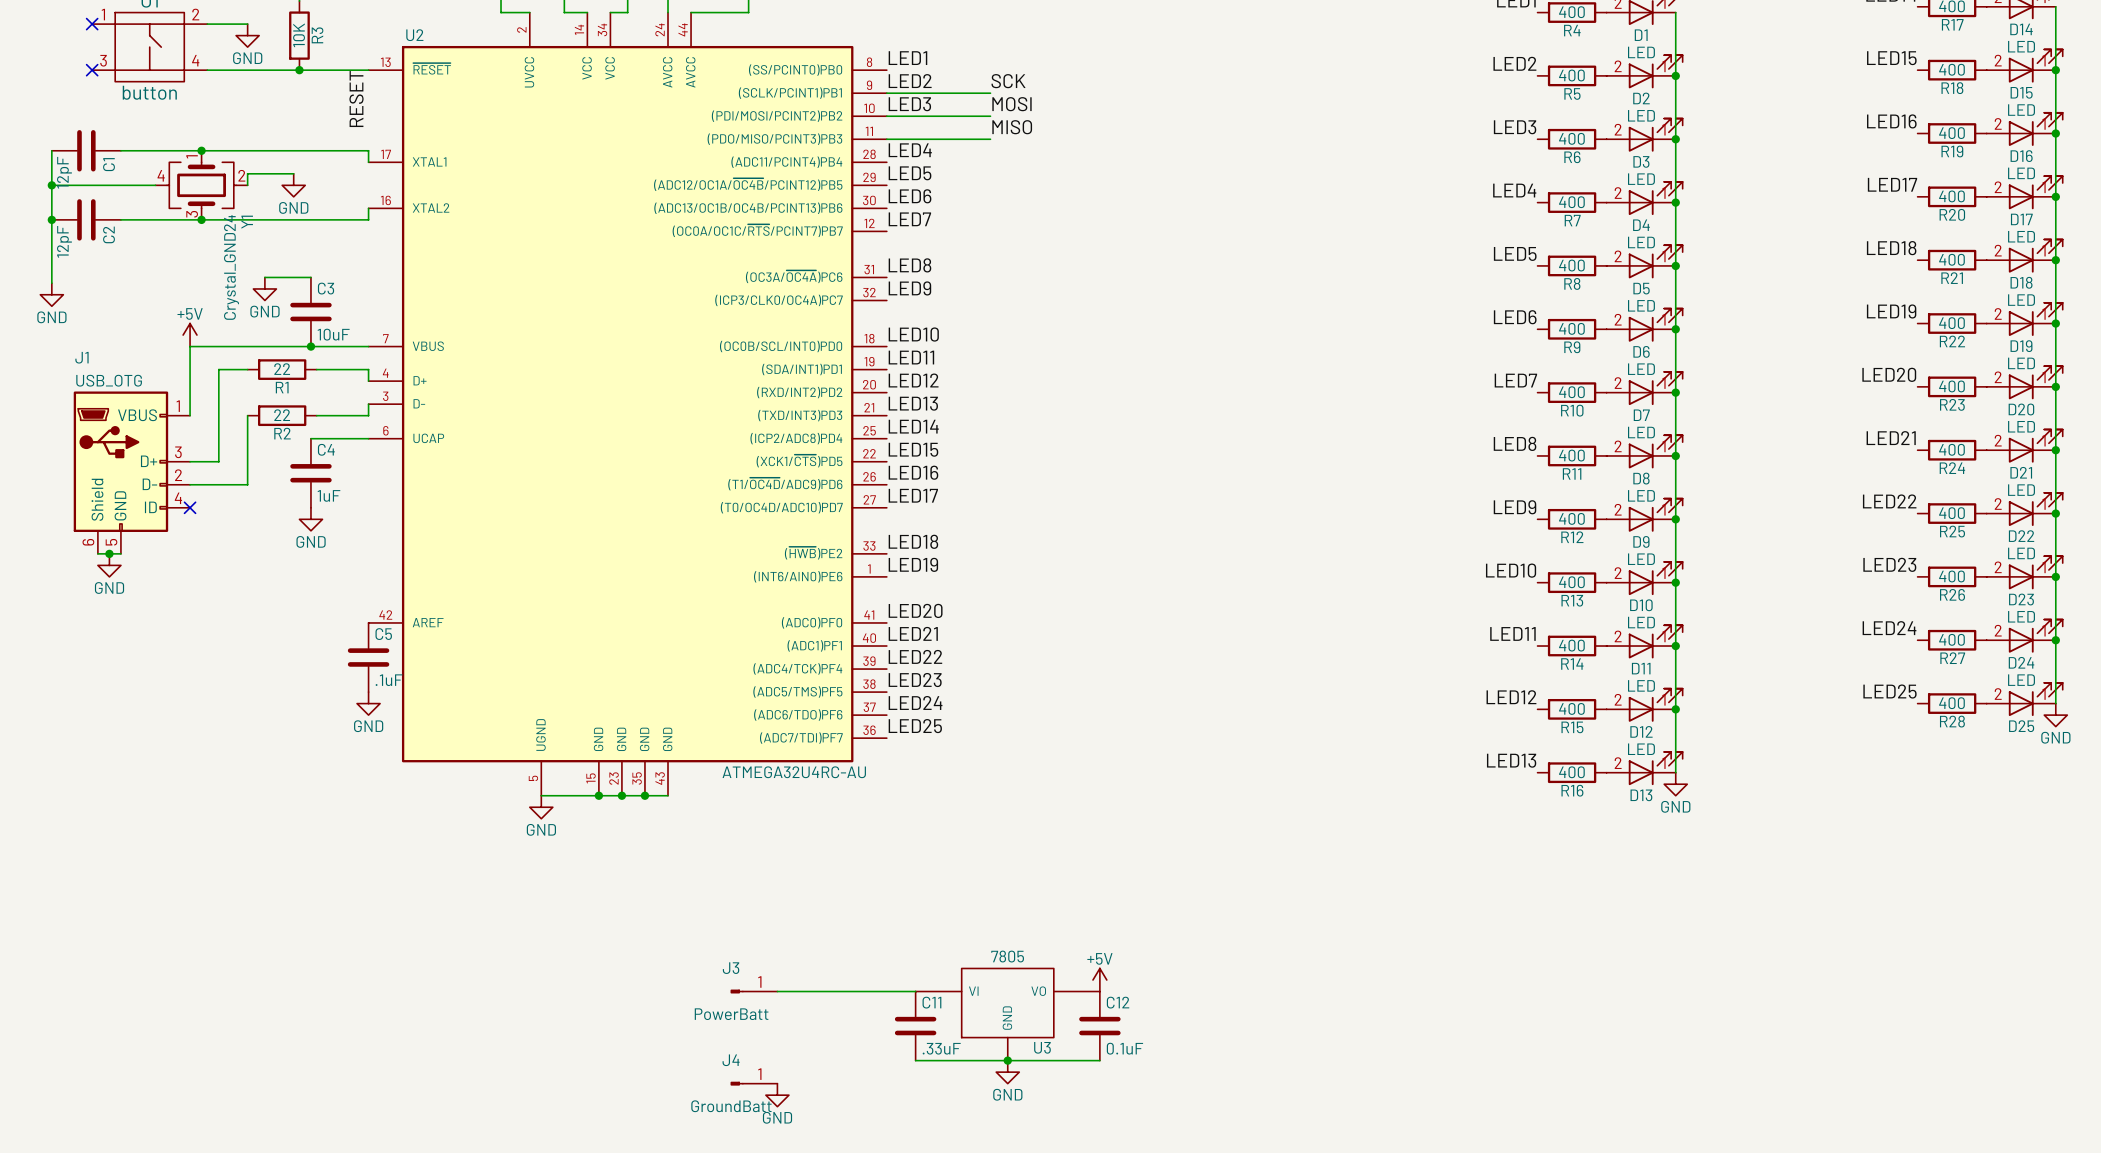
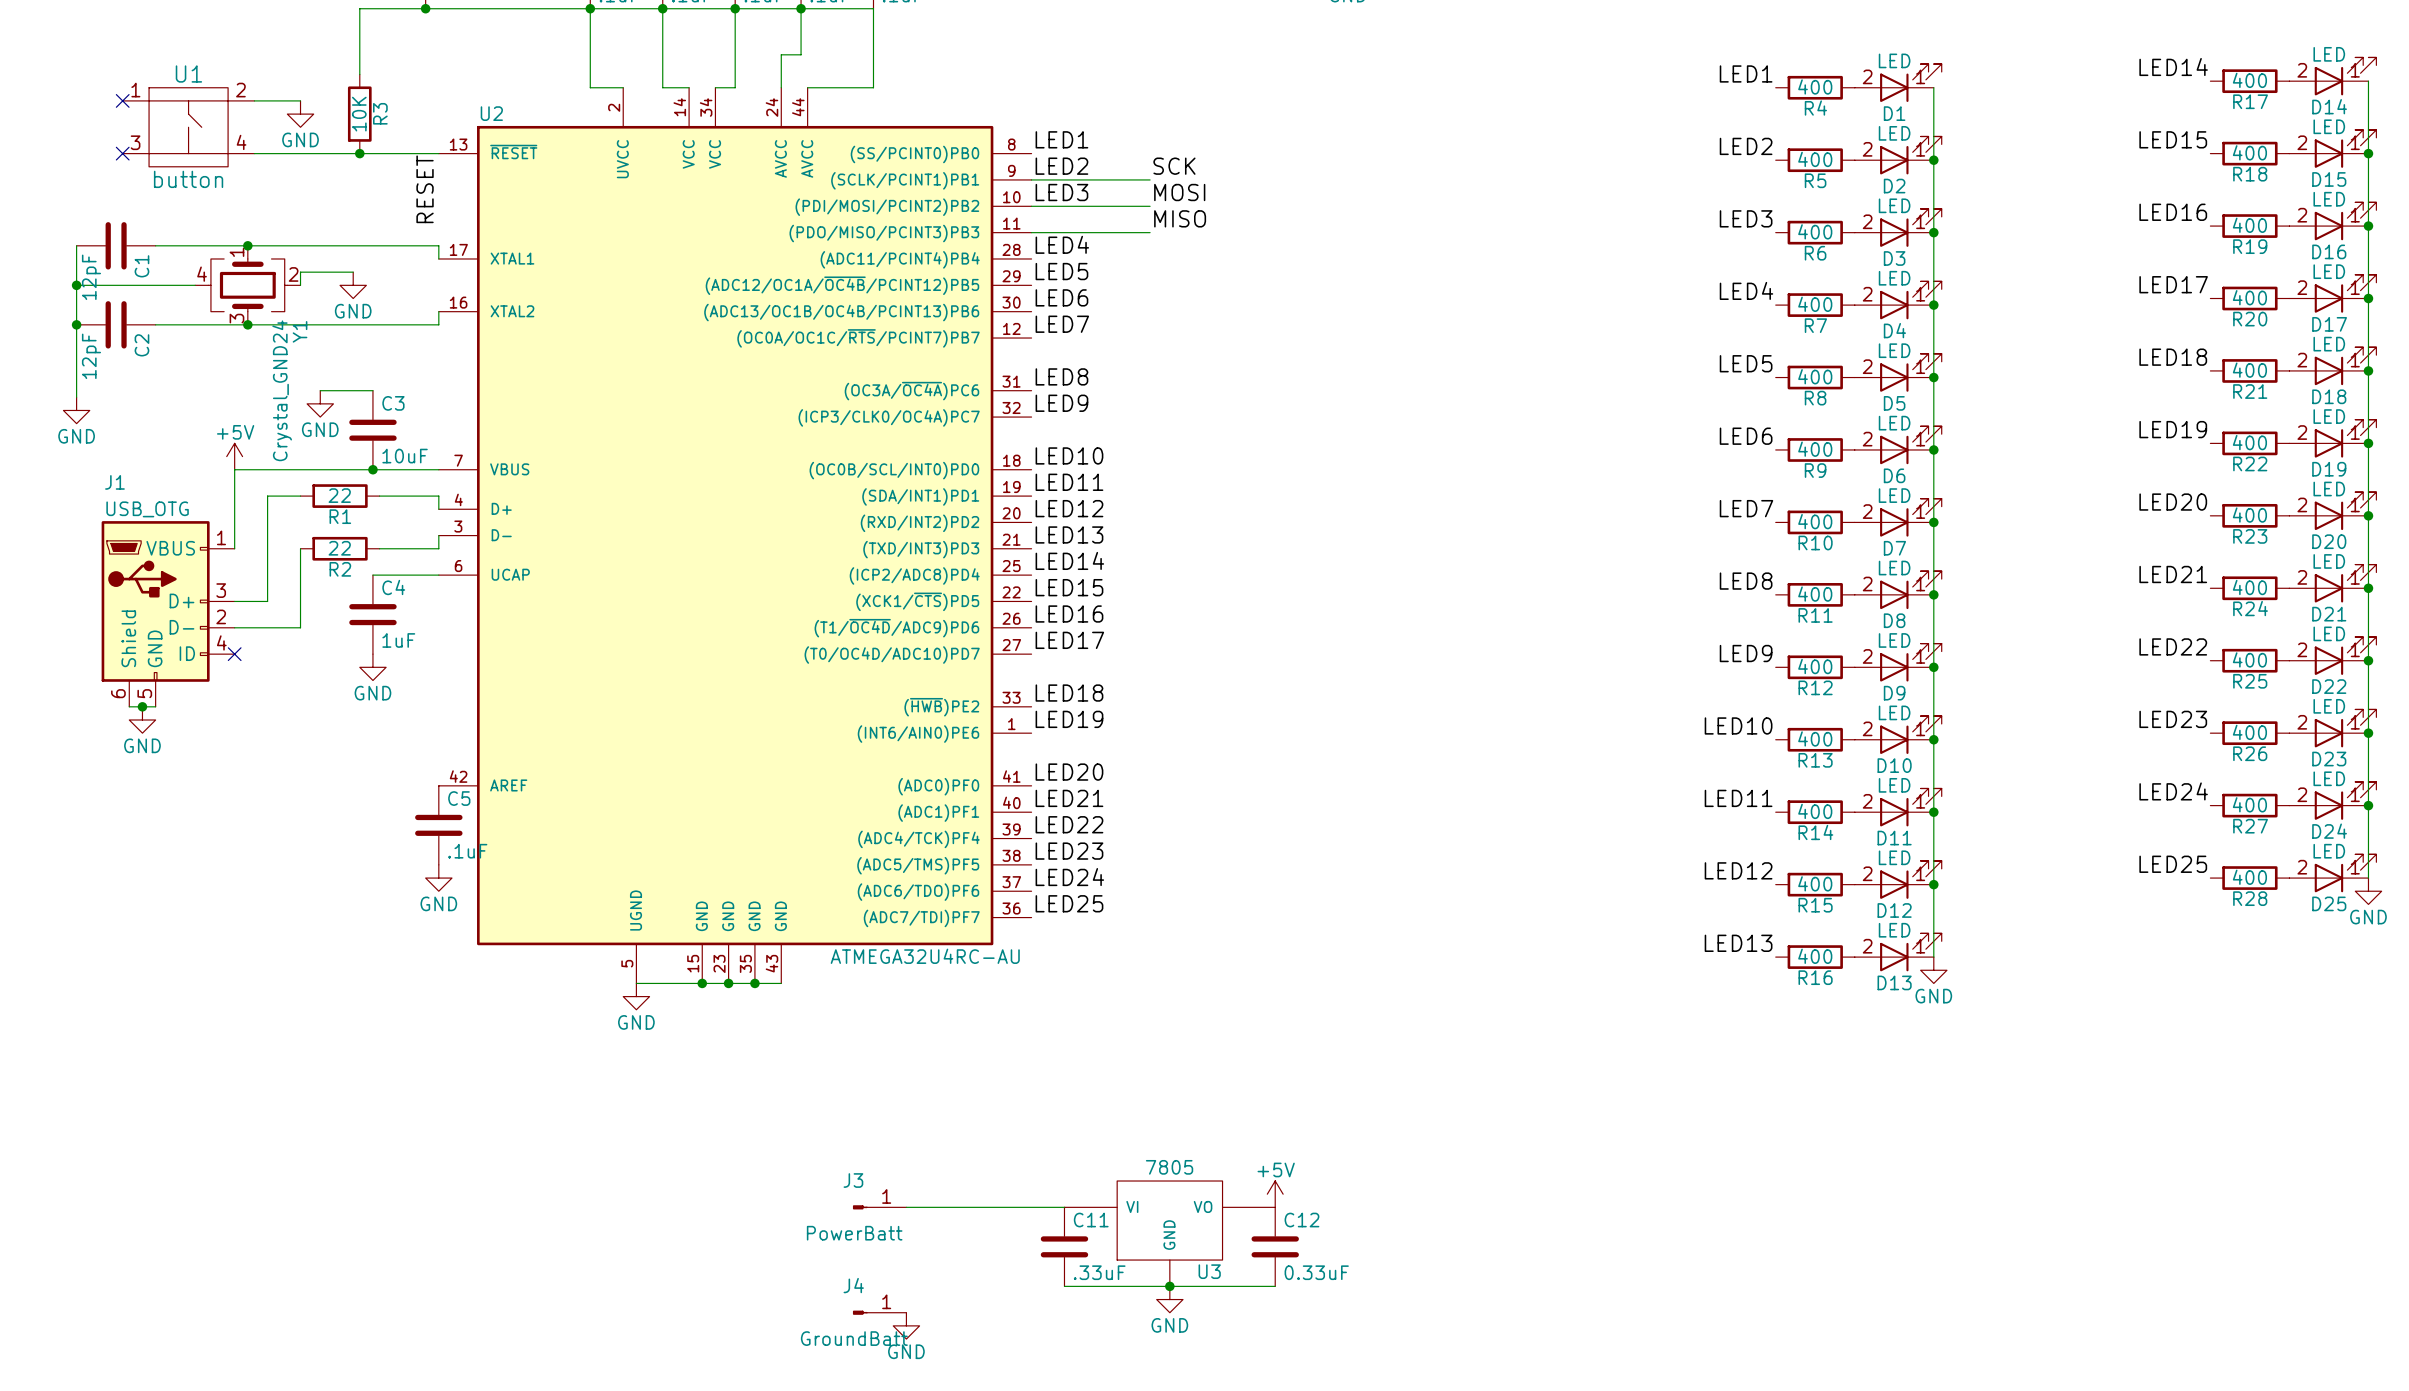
C12 value: 0.1uF (1124, 1048) -> 0.33uF (1316, 1272)

